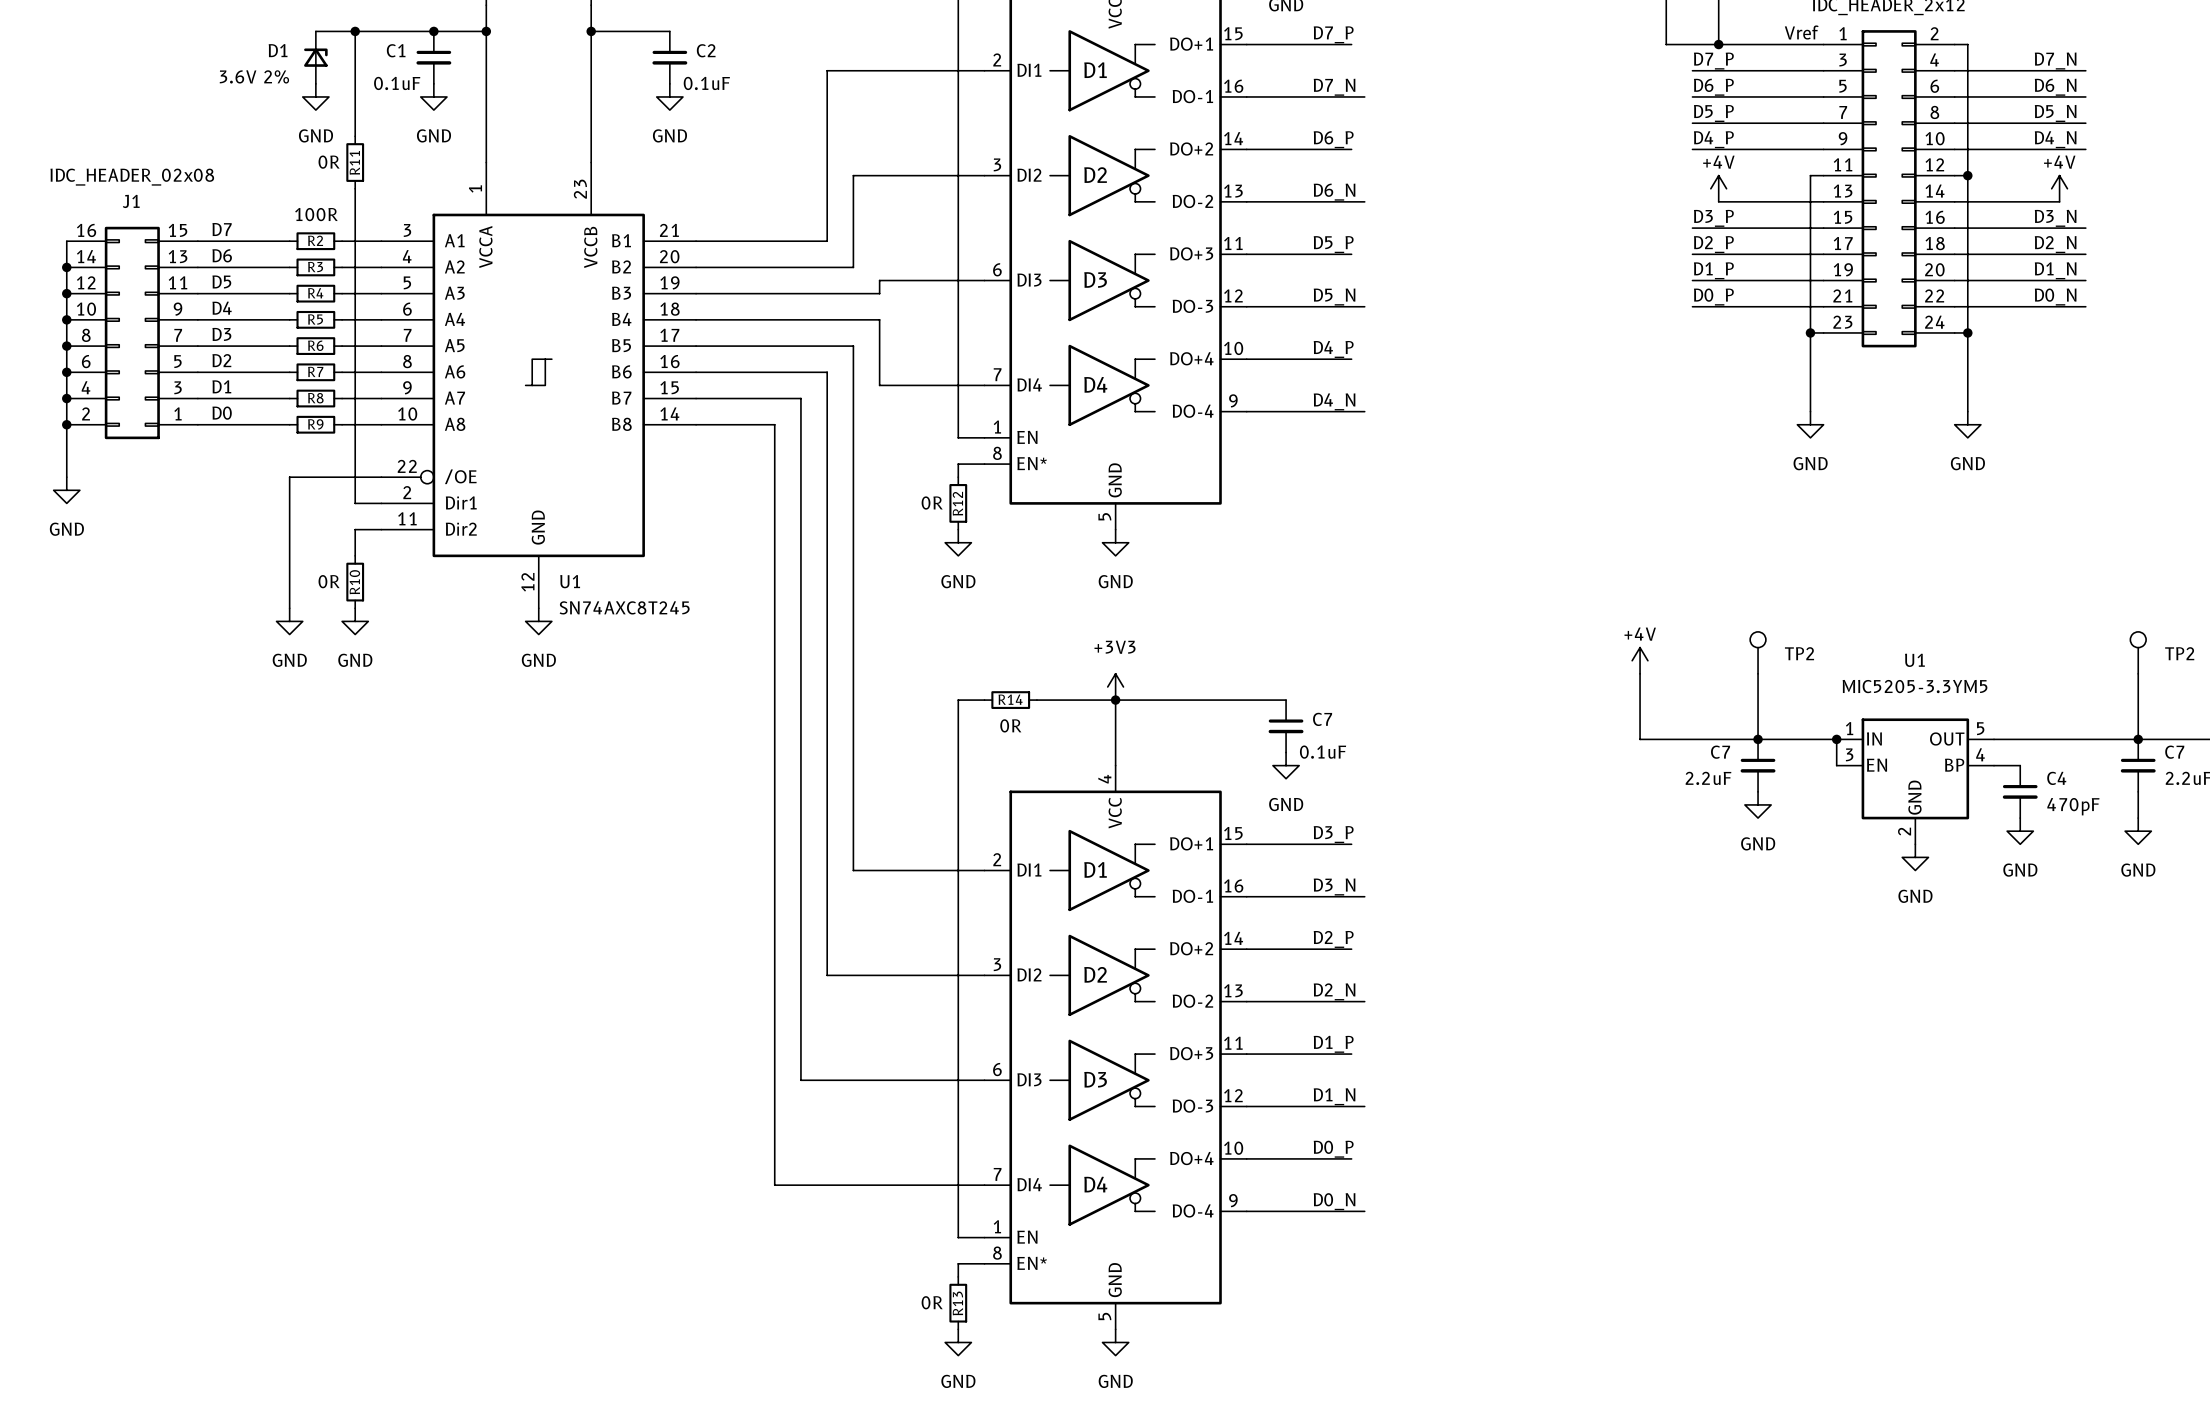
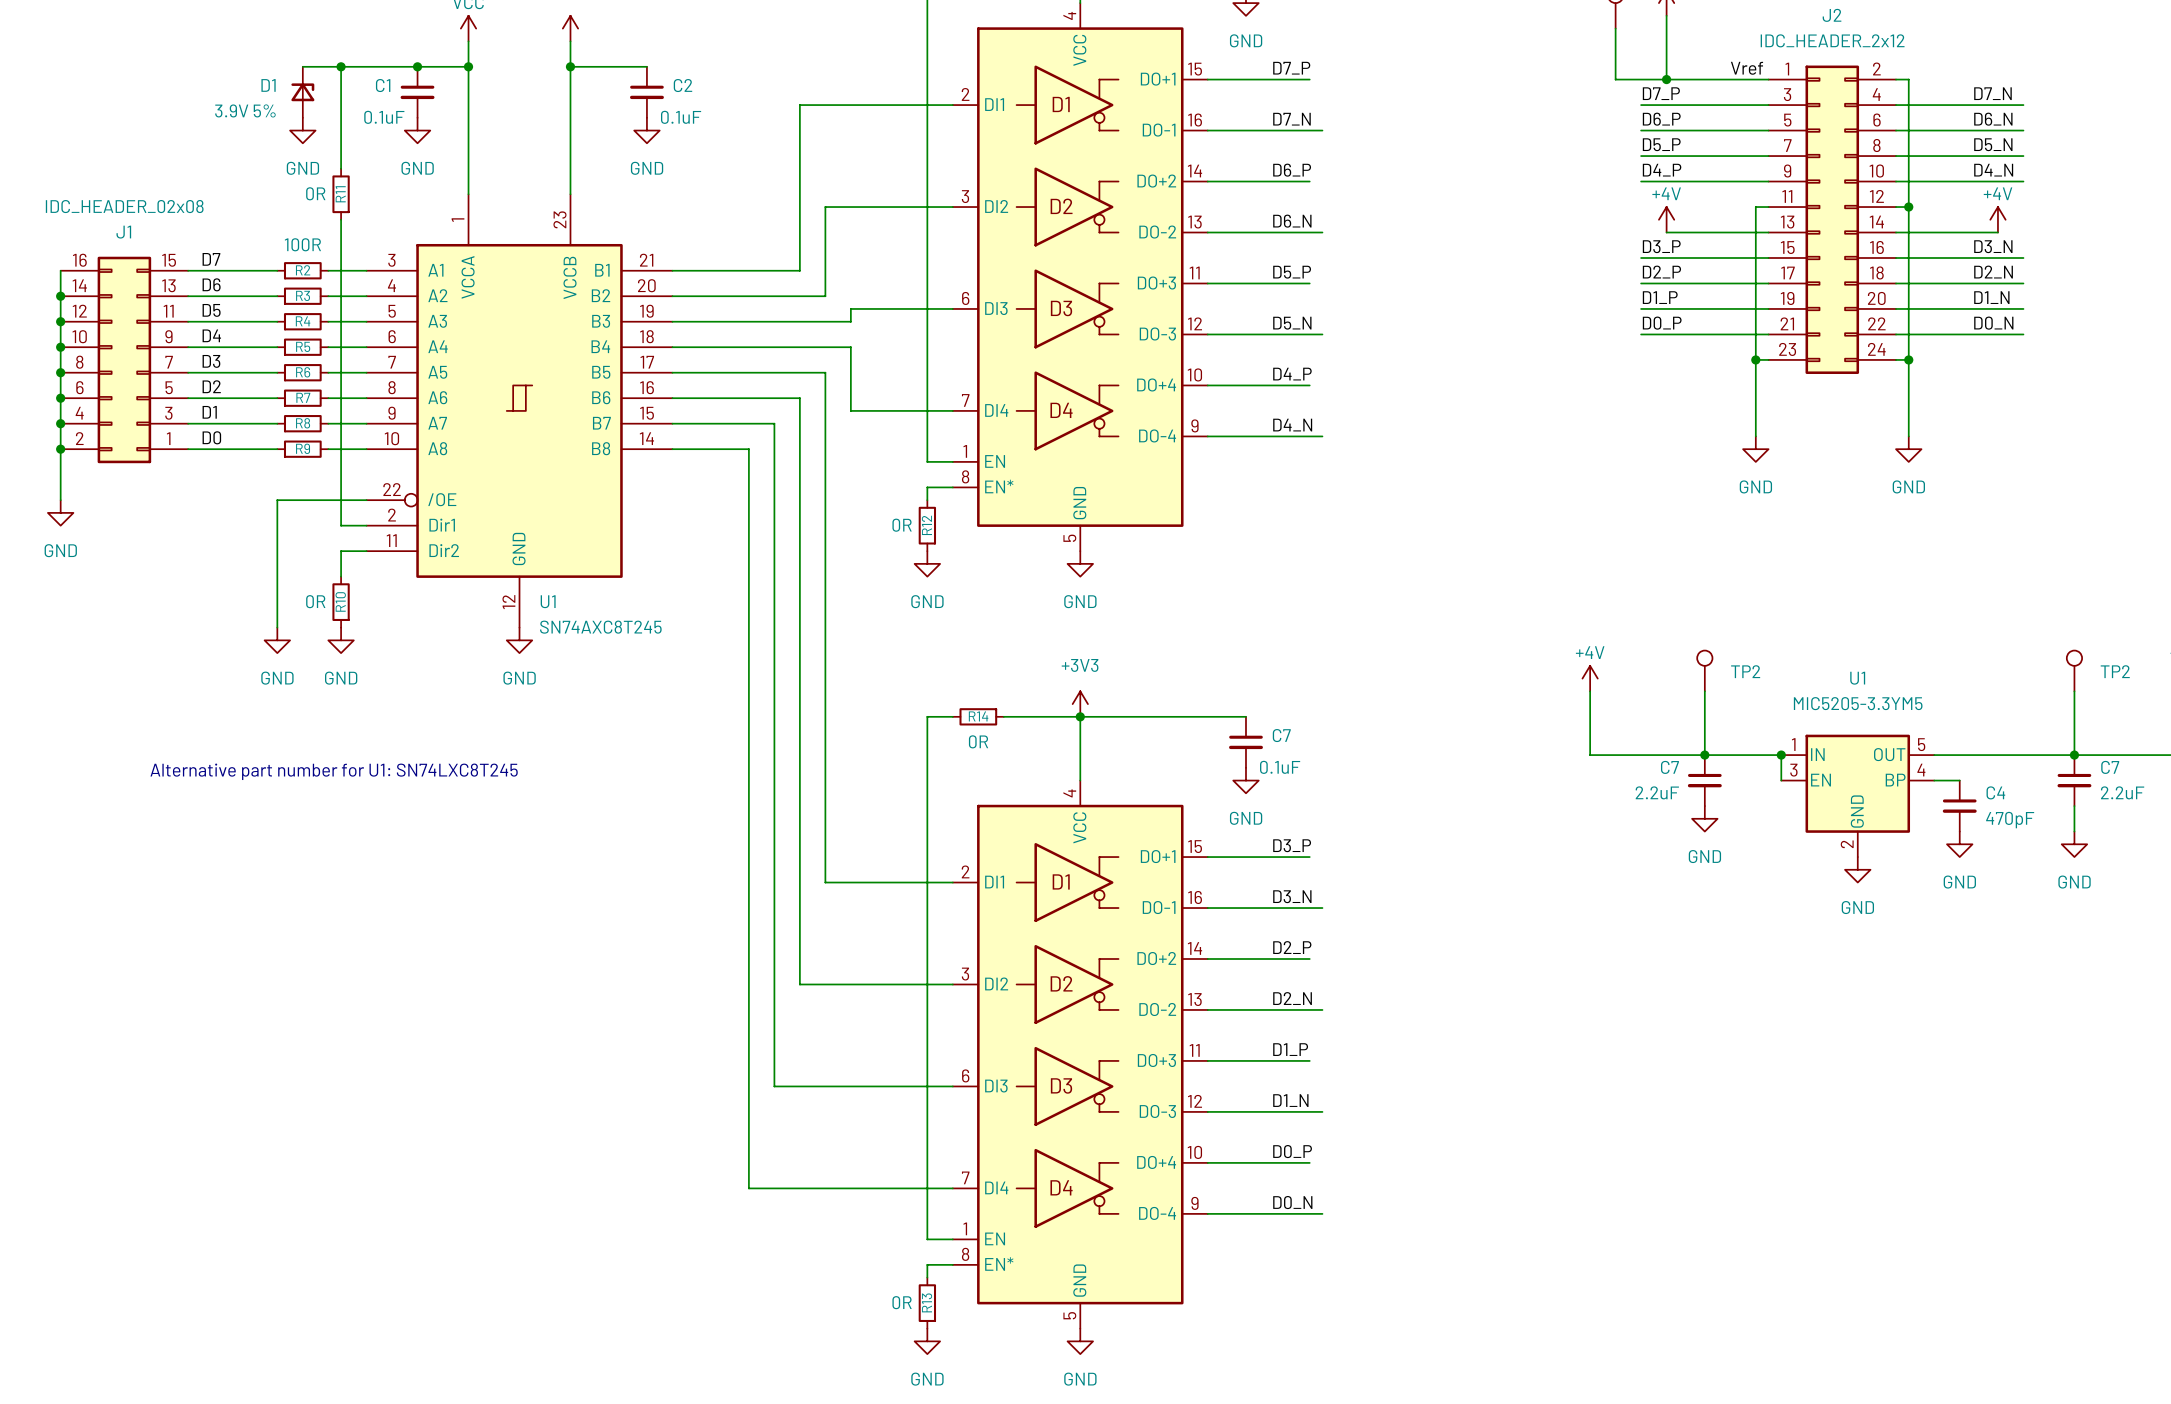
D1 value: 3.6V 2% (254, 76) -> 3.9V 5% (245, 110)
text: none -> Alternative part number for U1: SN74LXC8T245 (334, 771)

